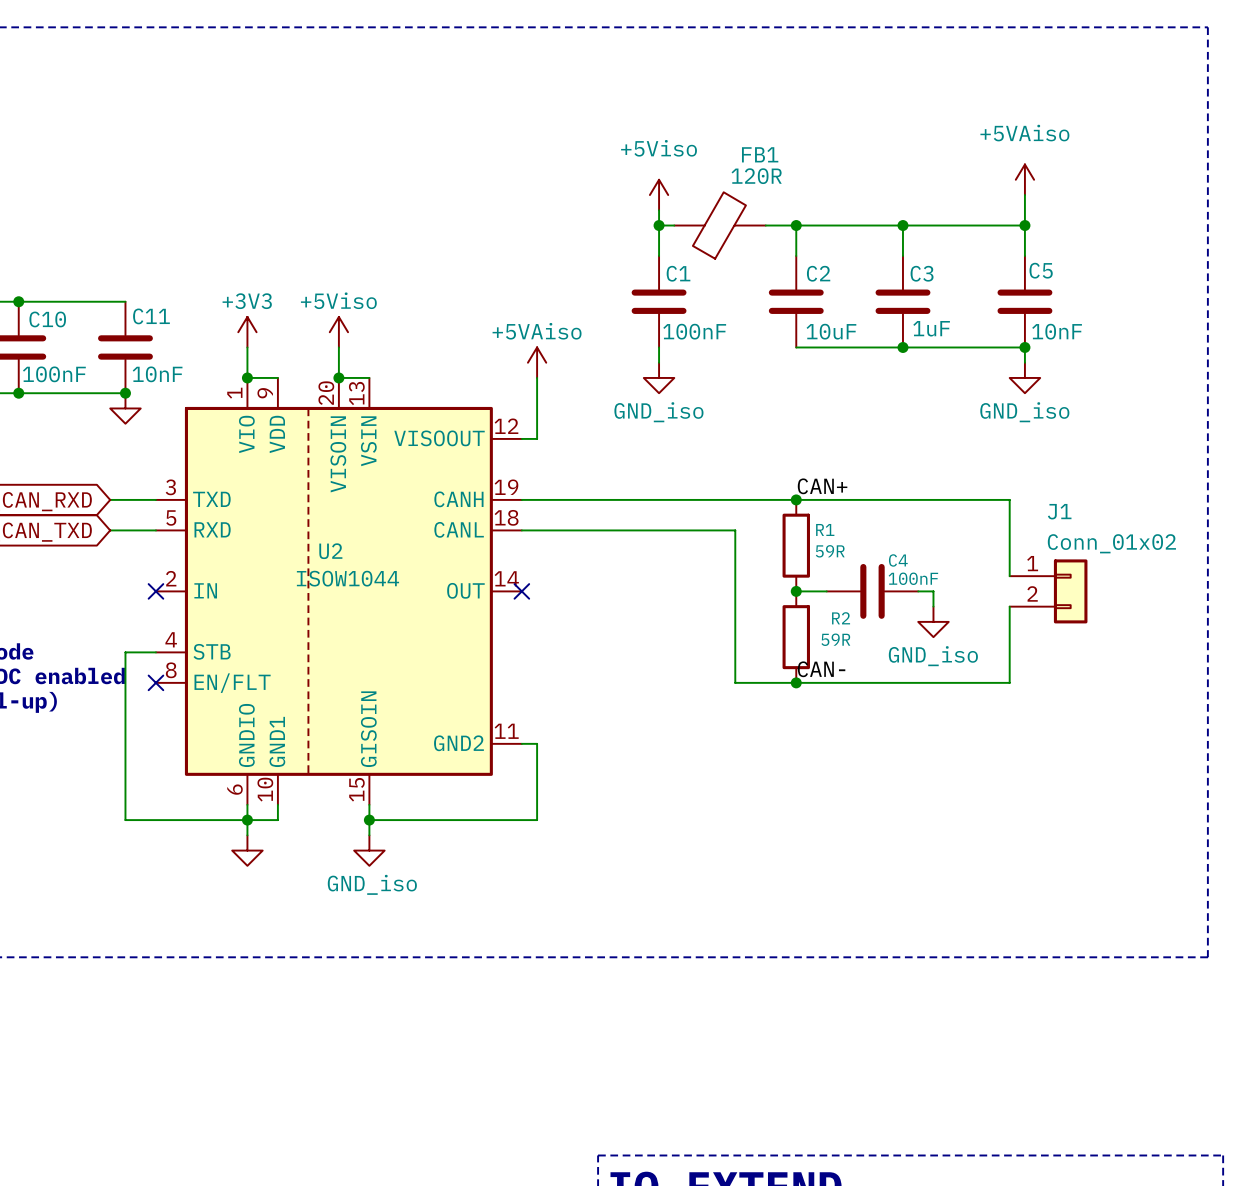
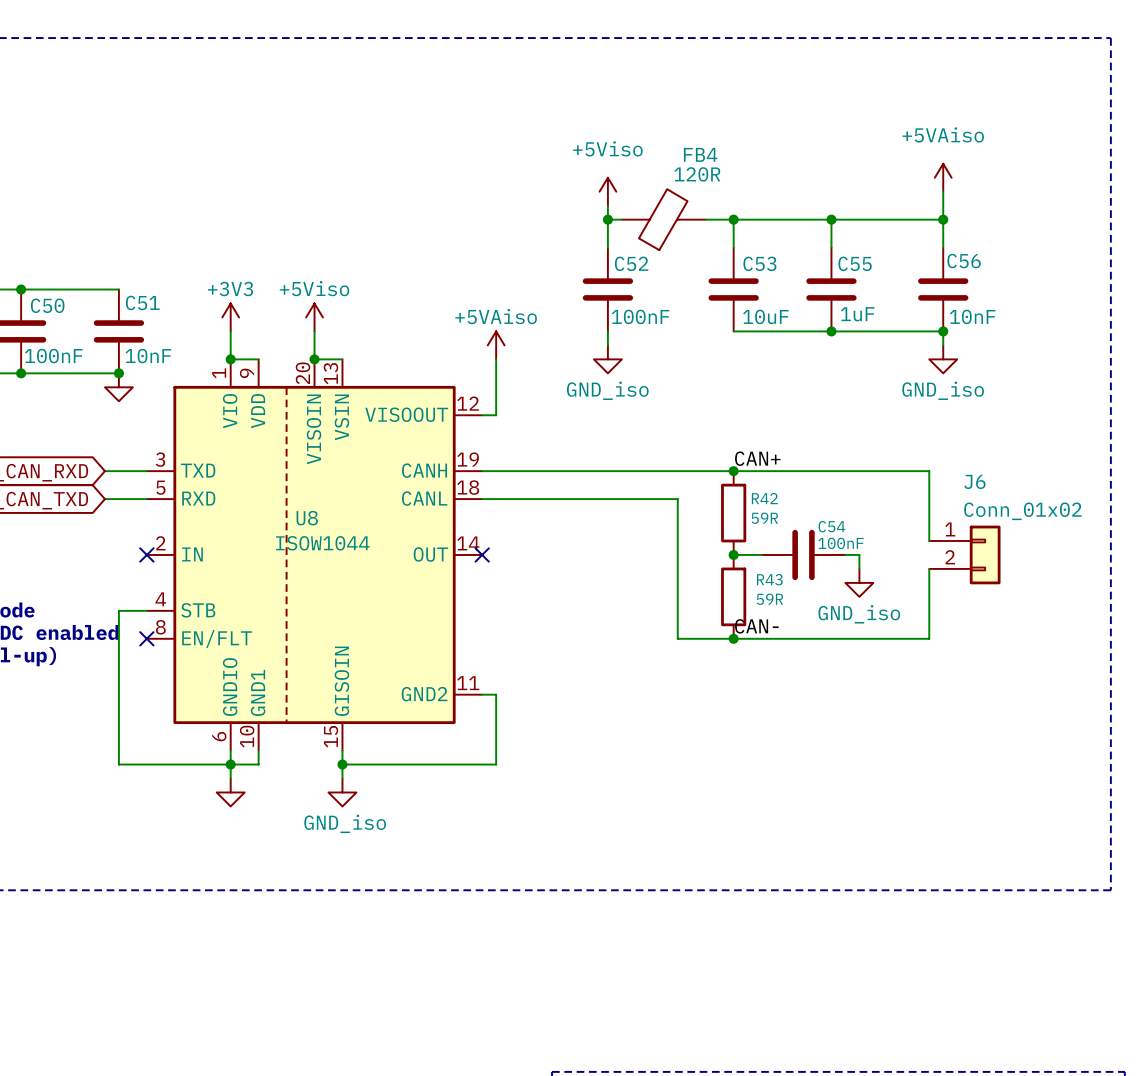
FB1 name: FB1 (760, 154) -> FB4 (700, 154)
C5 name: C5 (1041, 270) -> C56 (964, 261)
C1 name: C1 (678, 273) -> C52 (631, 263)
C2 name: C2 (818, 273) -> C53 (759, 263)
C3 name: C3 (922, 273) -> C55 (855, 263)
C11 name: C11 (151, 316) -> C51 (142, 302)
C10 name: C10 (47, 319) -> C50 (47, 305)
J1 name: J1 (1059, 511) -> J6 (974, 481)
R1 name: R1 (825, 529) -> R42 (764, 498)
U2 name: U2 (330, 551) -> U8 (307, 518)
C4 name: C4 (898, 560) -> C54 (831, 526)
R2 name: R2 (841, 618) -> R43 (769, 579)

